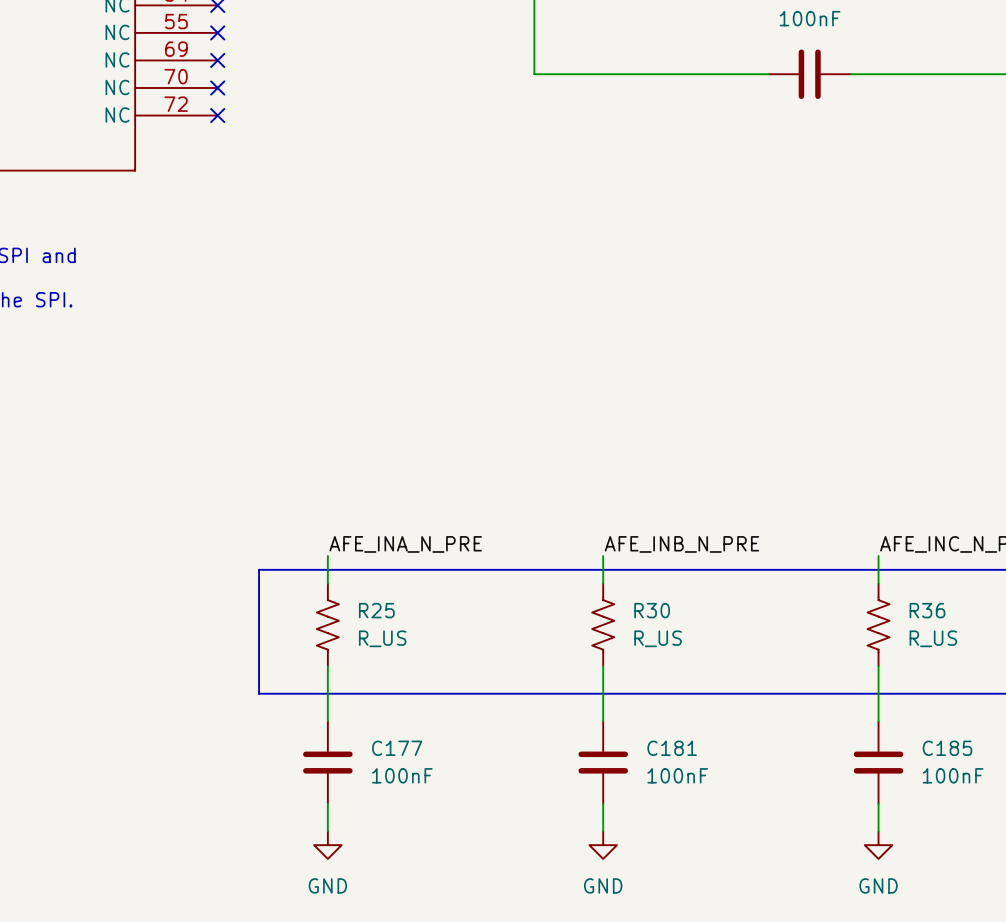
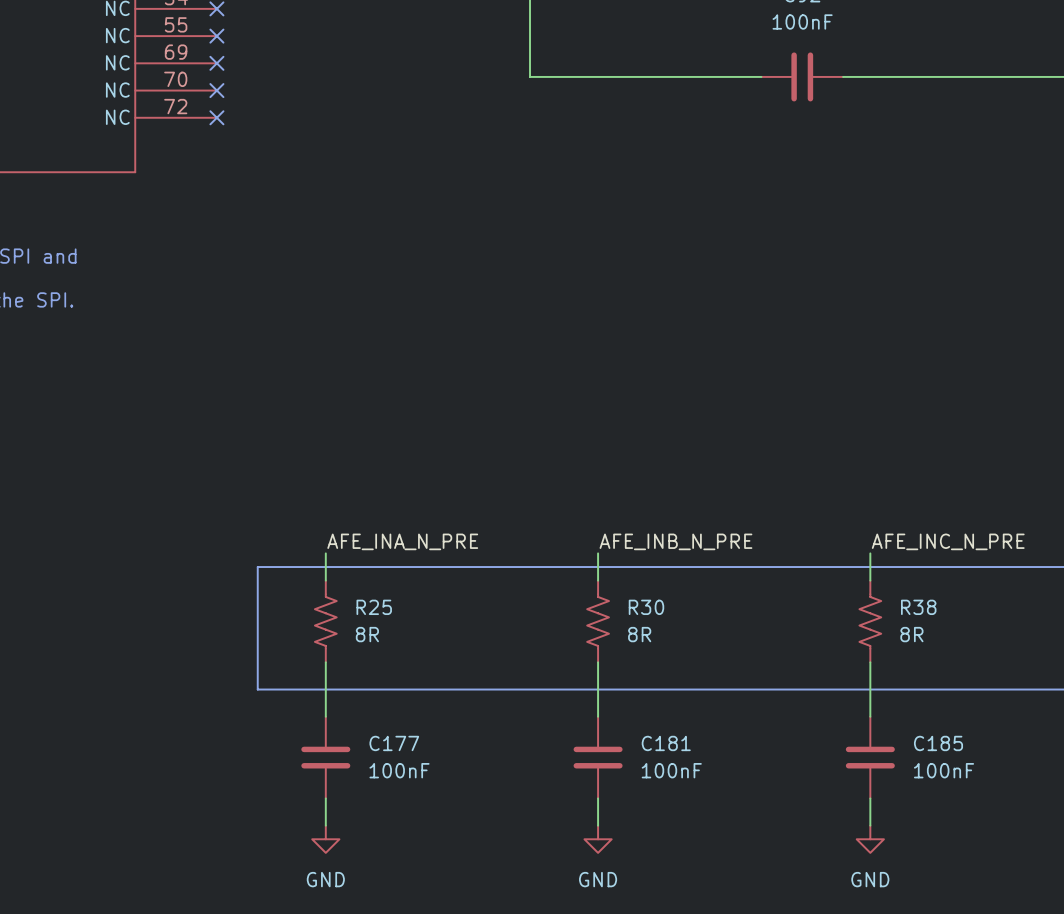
R36 name: R36 (927, 610) -> R38 (918, 607)
R25 value: R_US (382, 638) -> 8R (367, 634)
R30 value: R_US (658, 638) -> 8R (639, 634)
R36 value: R_US (933, 638) -> 8R (911, 634)

